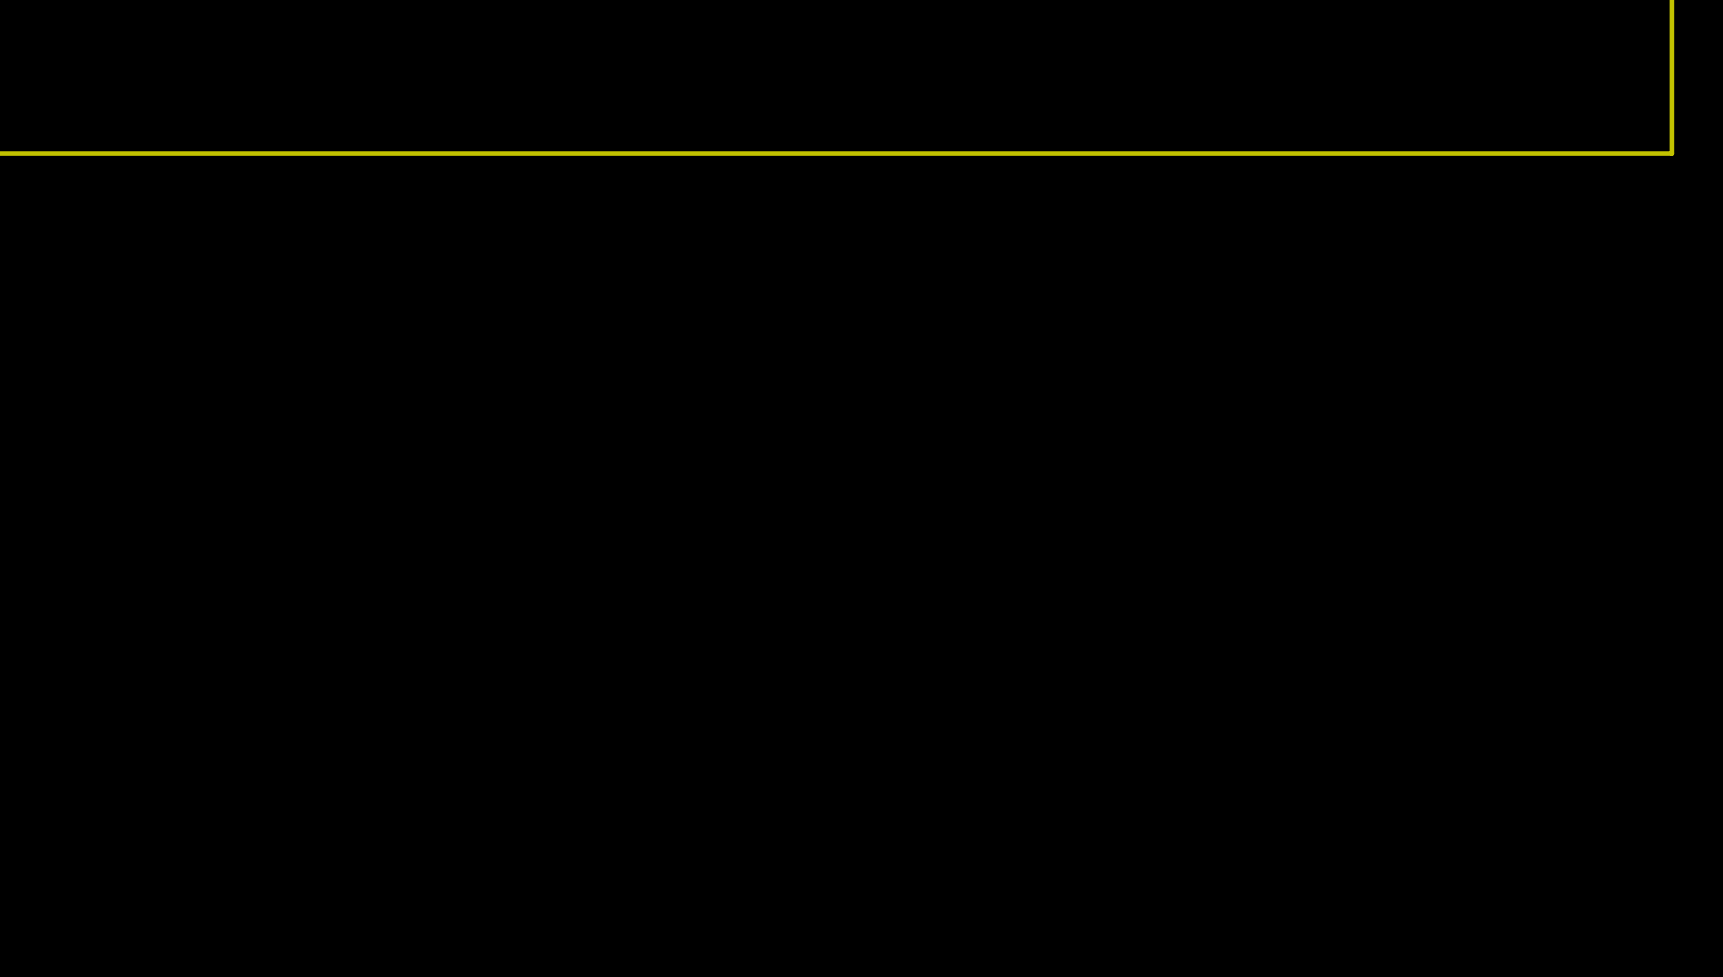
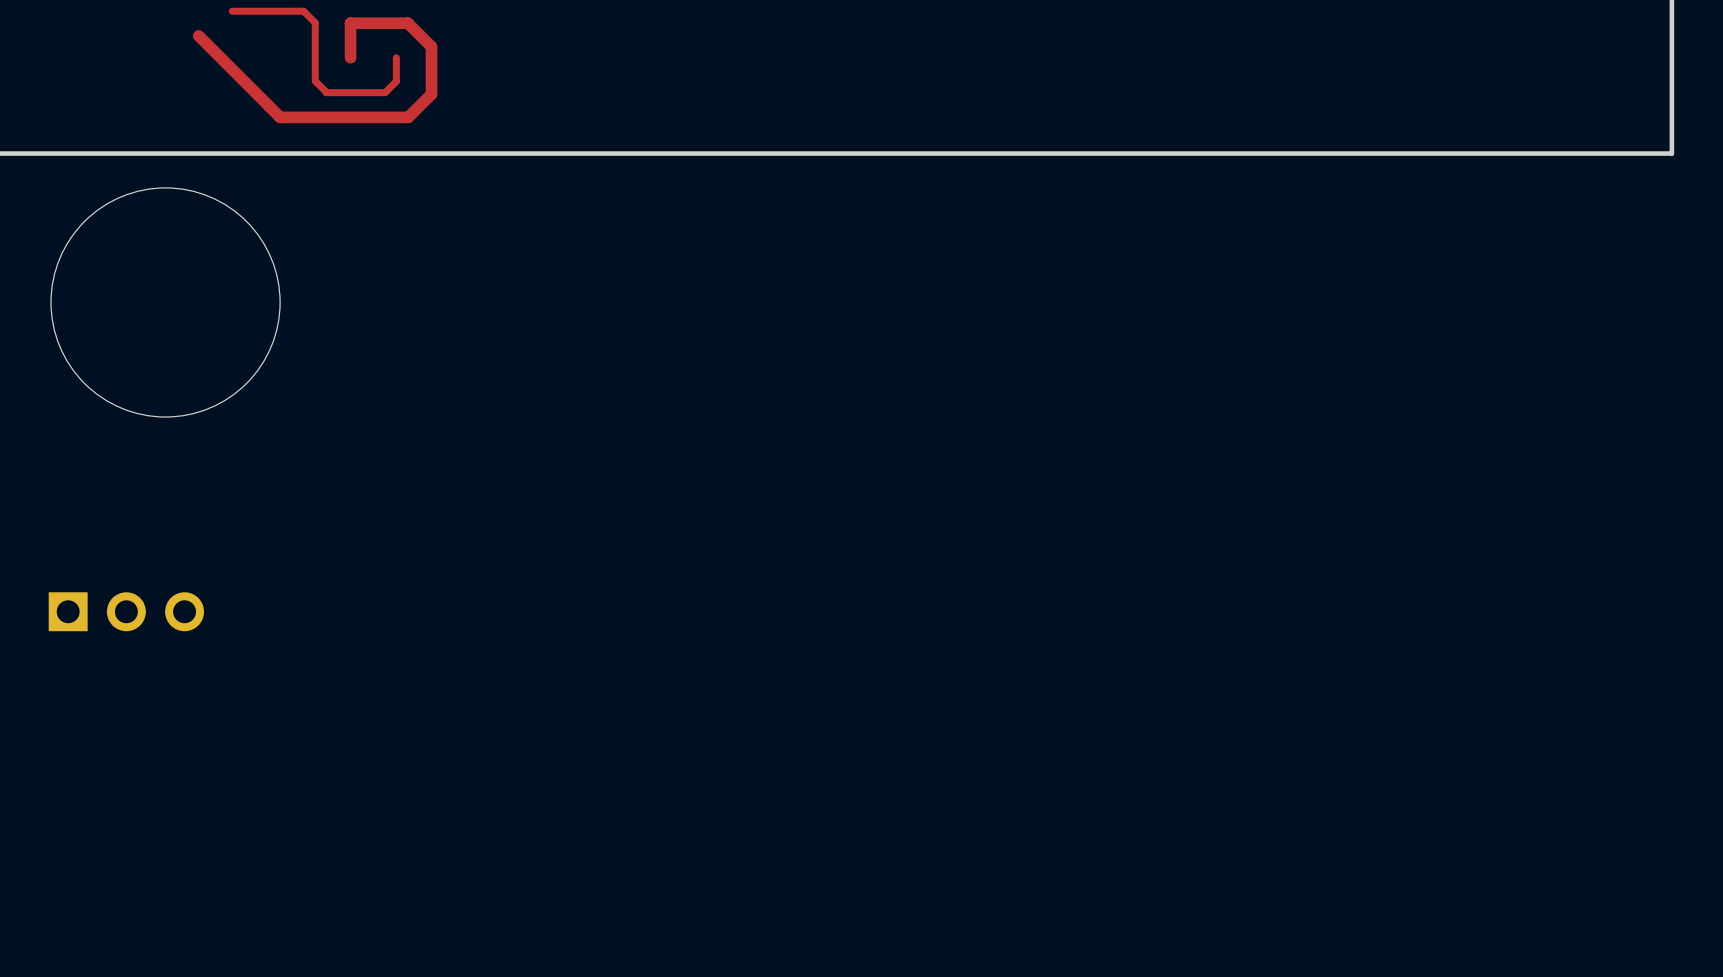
top track: none -> (232, 11) (303, 11) (315, 22) (315, 81) (326, 92) (385, 92) (396, 81) (396, 57)
top track: none -> (198, 35) (280, 117) (408, 117) (431, 94) (431, 46) (407, 23) (350, 23) (350, 57)
round board edge: none -> [50, 187, 281, 418]
part: none -> (126, 611)

